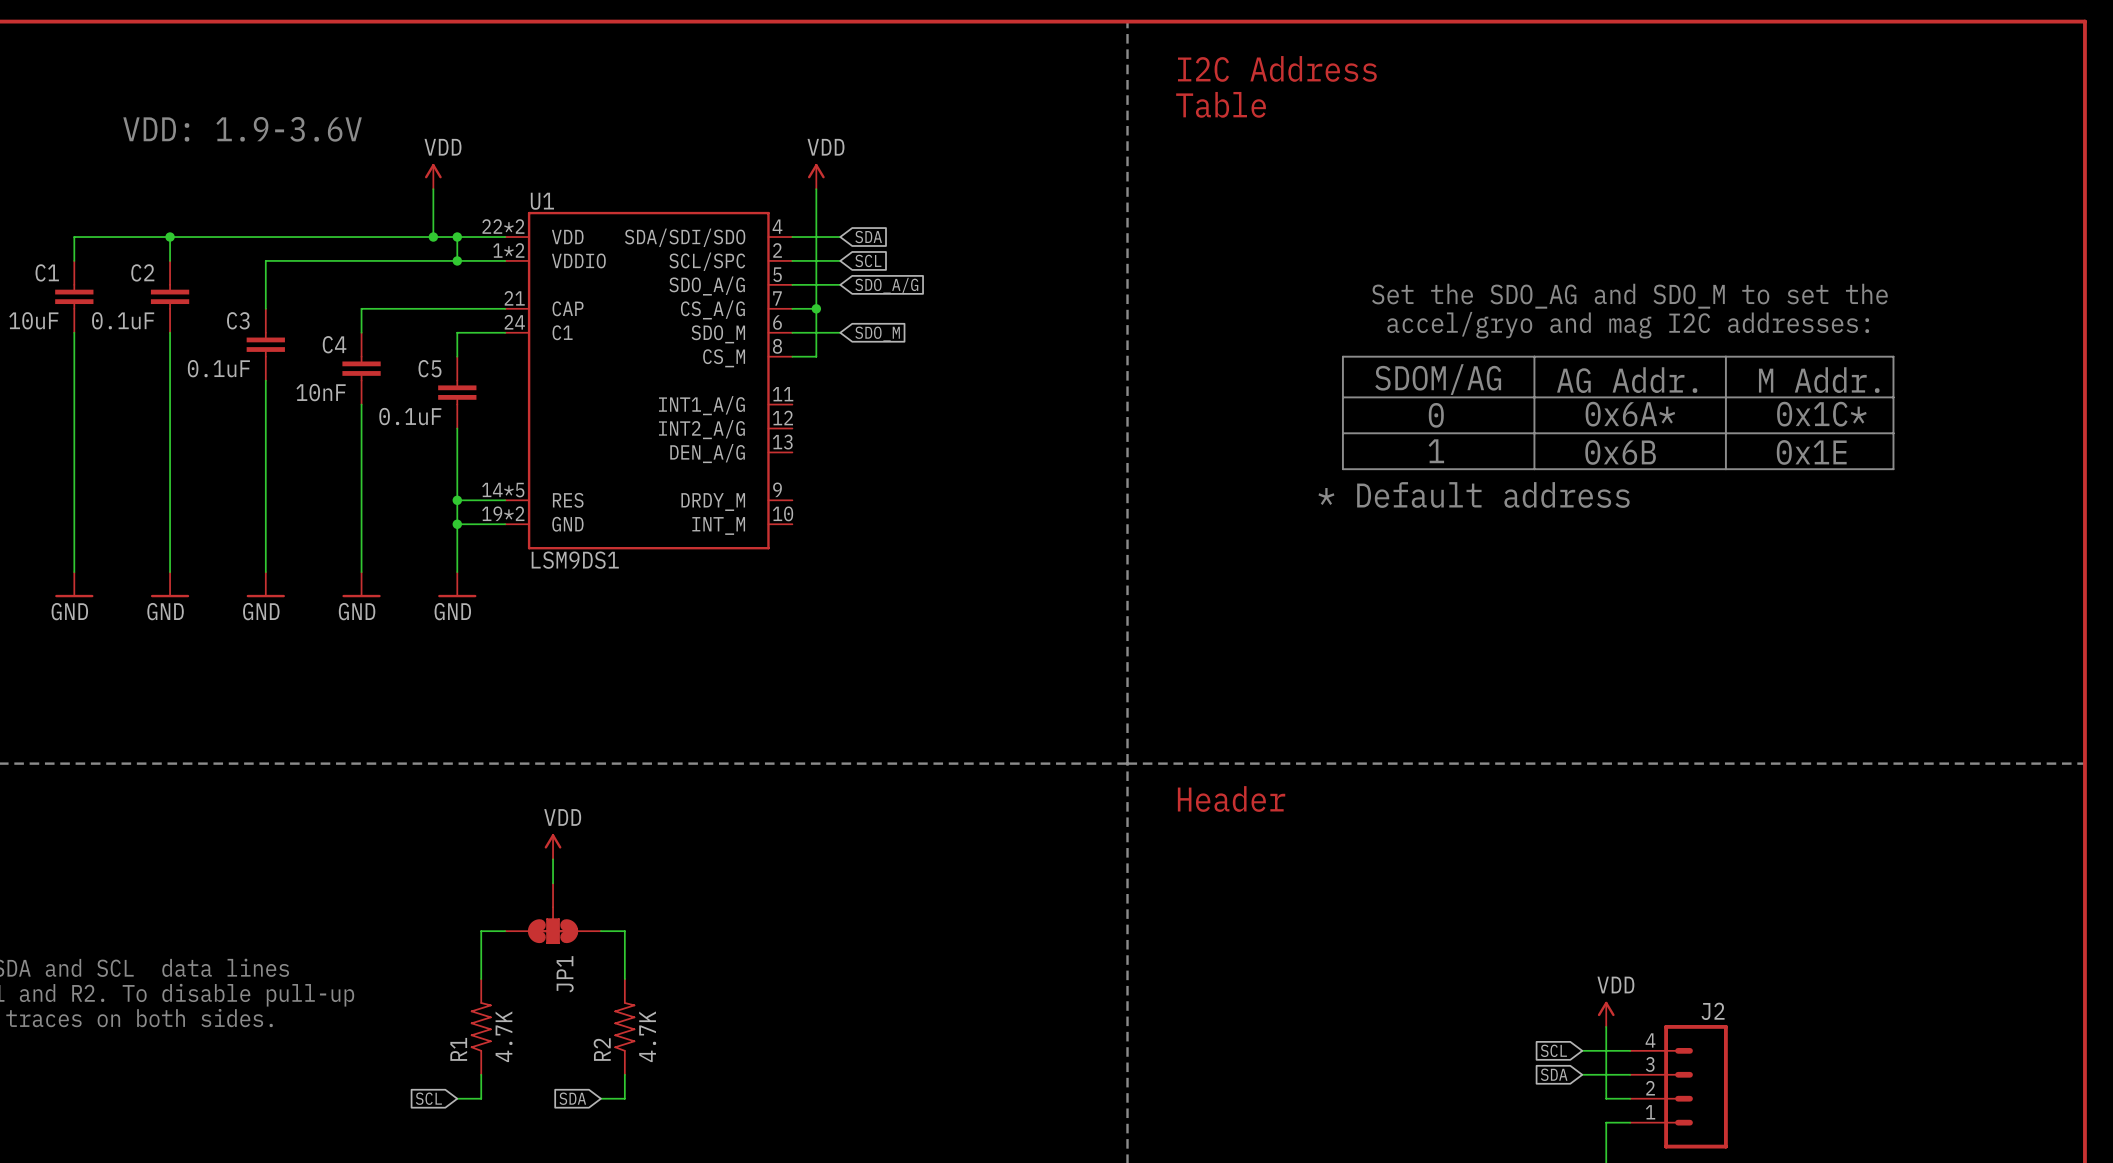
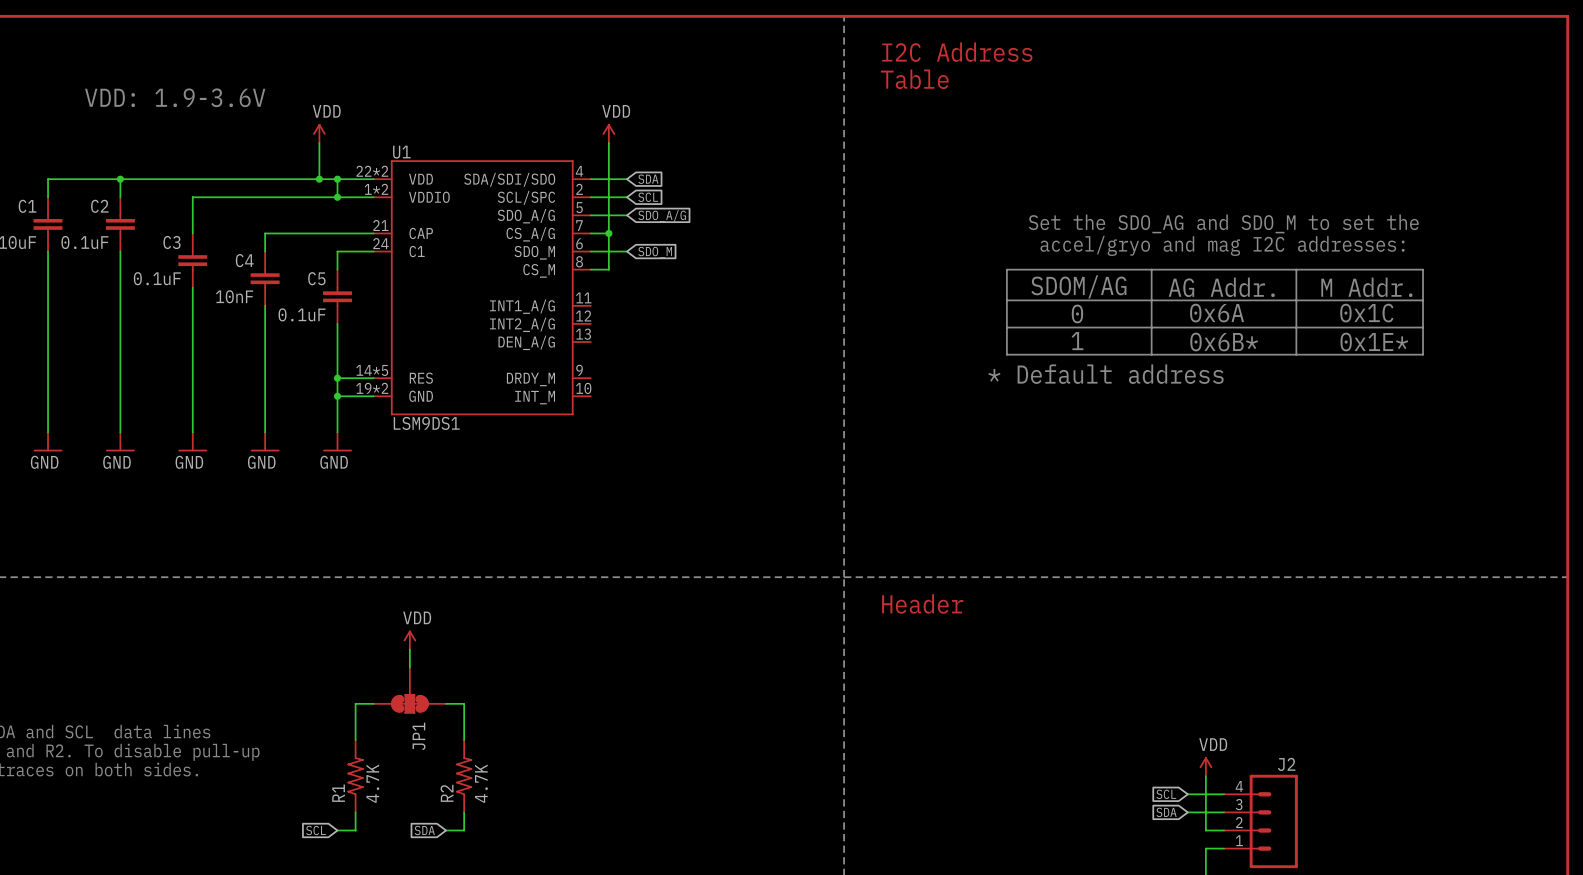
text: 0x6A* (1630, 414) -> 0x6A (1217, 313)
text: 0x1C* (1821, 414) -> 0x1C (1366, 313)
text: 0x6B (1620, 452) -> 0x6B* (1224, 342)
text: 0x1E (1811, 452) -> 0x1E* (1374, 342)

